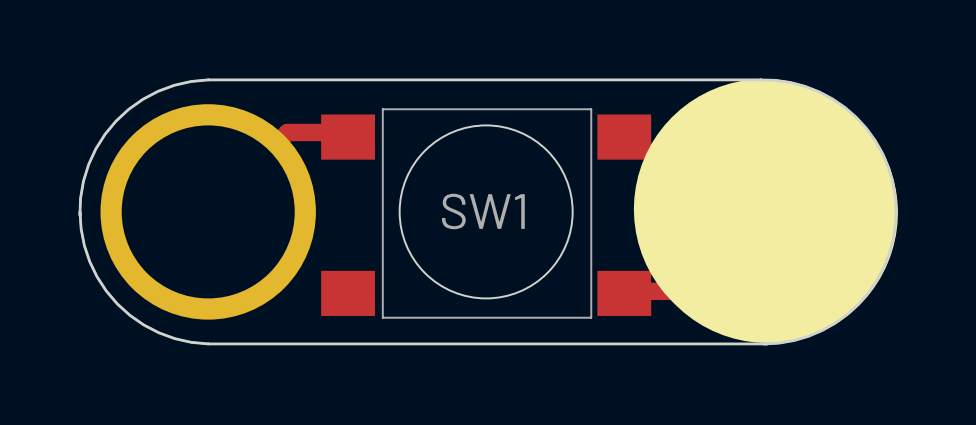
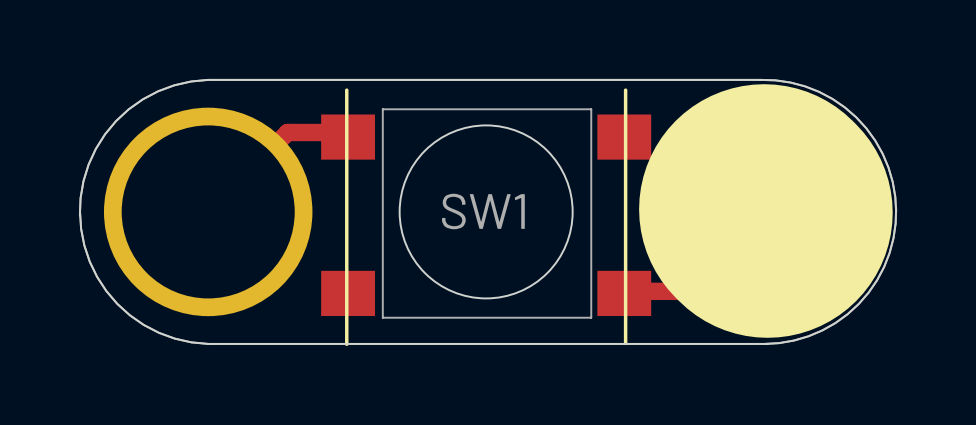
SW1 footprint: [78, 78, 898, 346] -> [79, 79, 897, 347]

